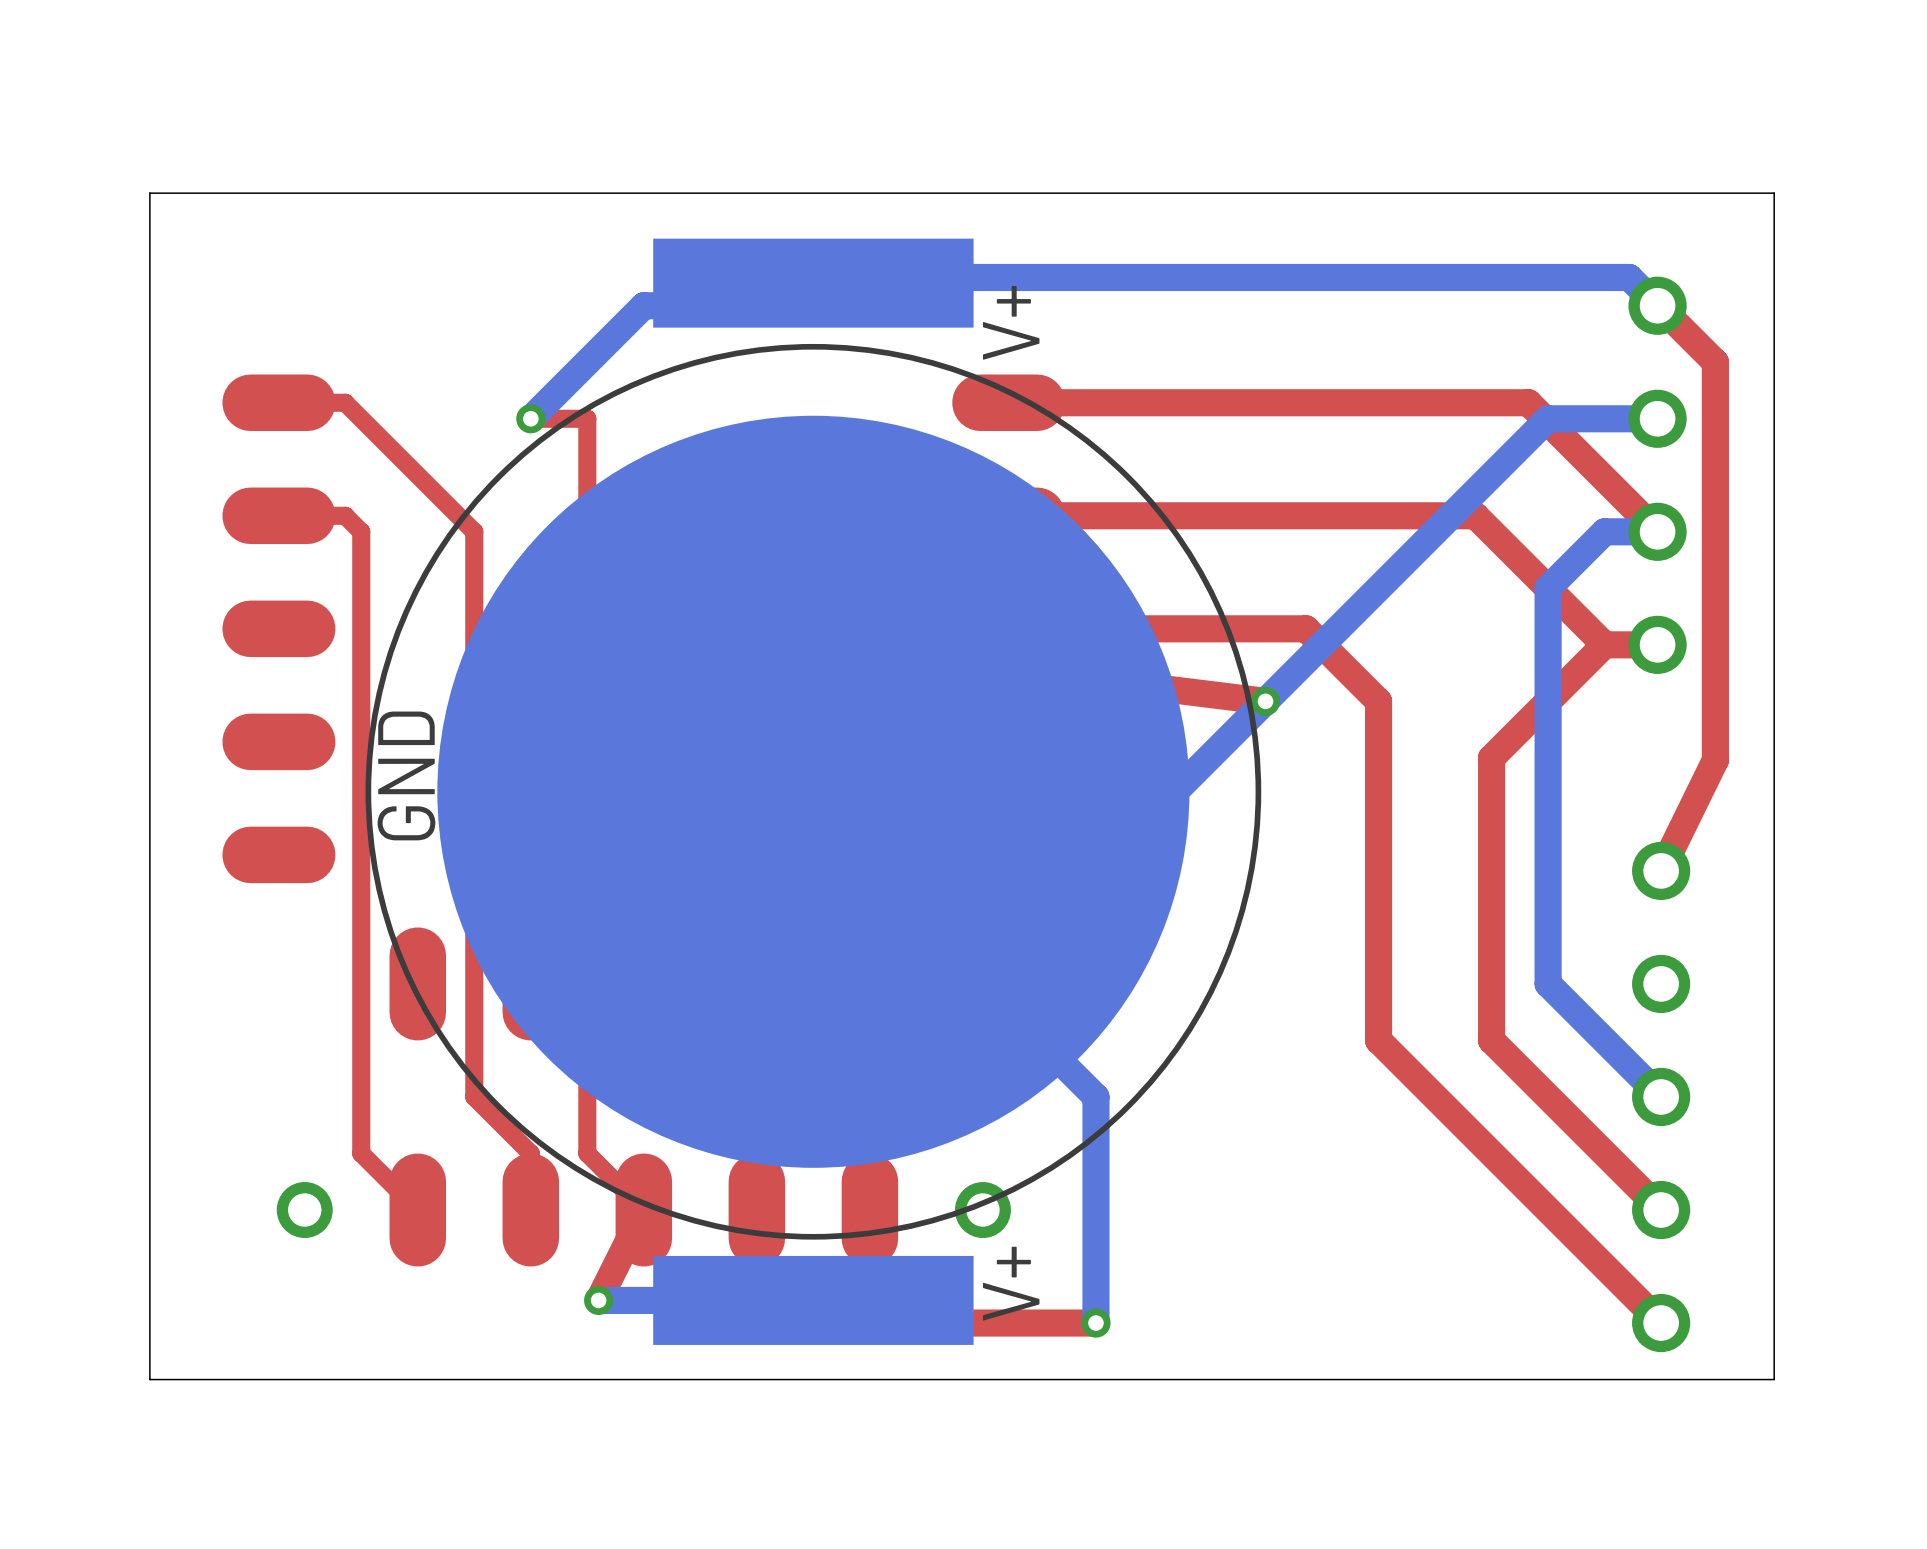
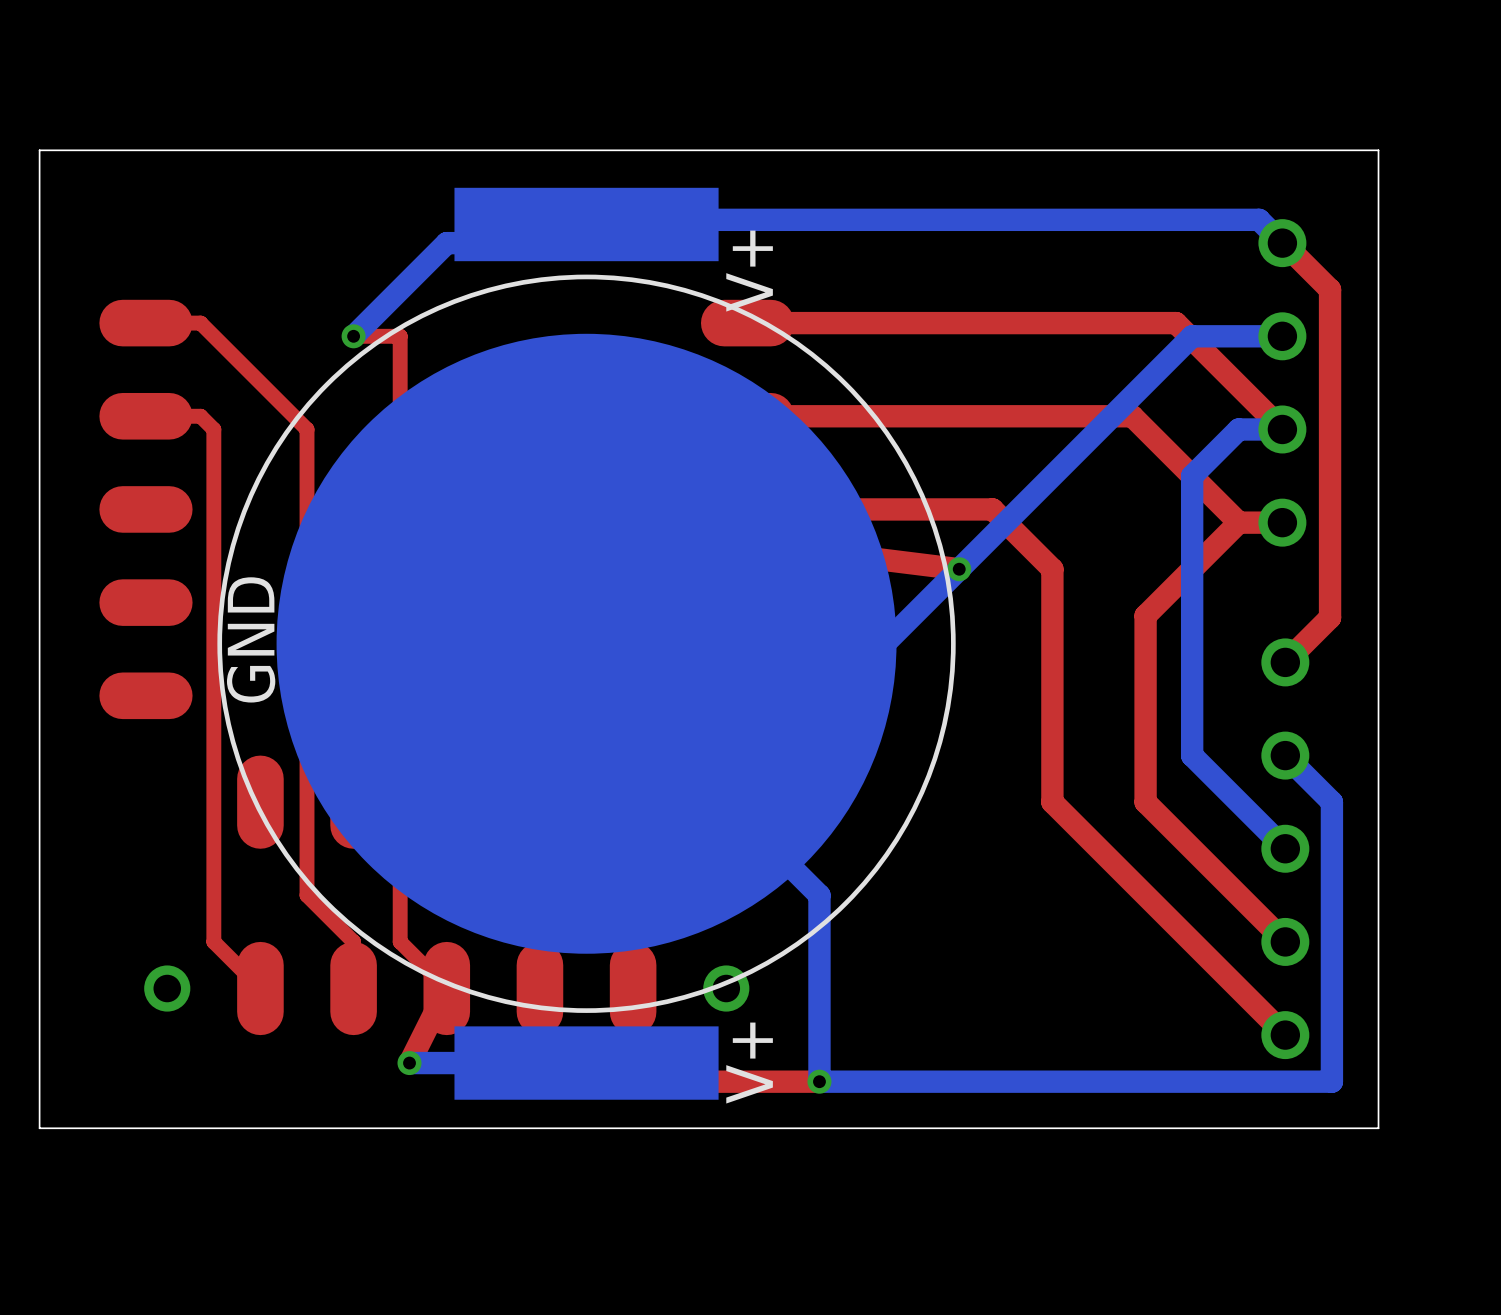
top track: (1715, 760) (1661, 870) -> (1330, 617) (1285, 662)
bottom track: (1548, 927) (1548, 983) (1661, 1096) -> (1192, 755) (1285, 848)
bottom track: none -> (1285, 755) (1331, 802) (1331, 1081) (819, 1081)
top track: (1378, 983) (1378, 1040) (1661, 1323) -> (1052, 802) (1285, 1035)
top track: (1491, 983) (1491, 1040) (1661, 1210) -> (1145, 802) (1285, 941)
part position: (1661, 1096) -> (1285, 848)

